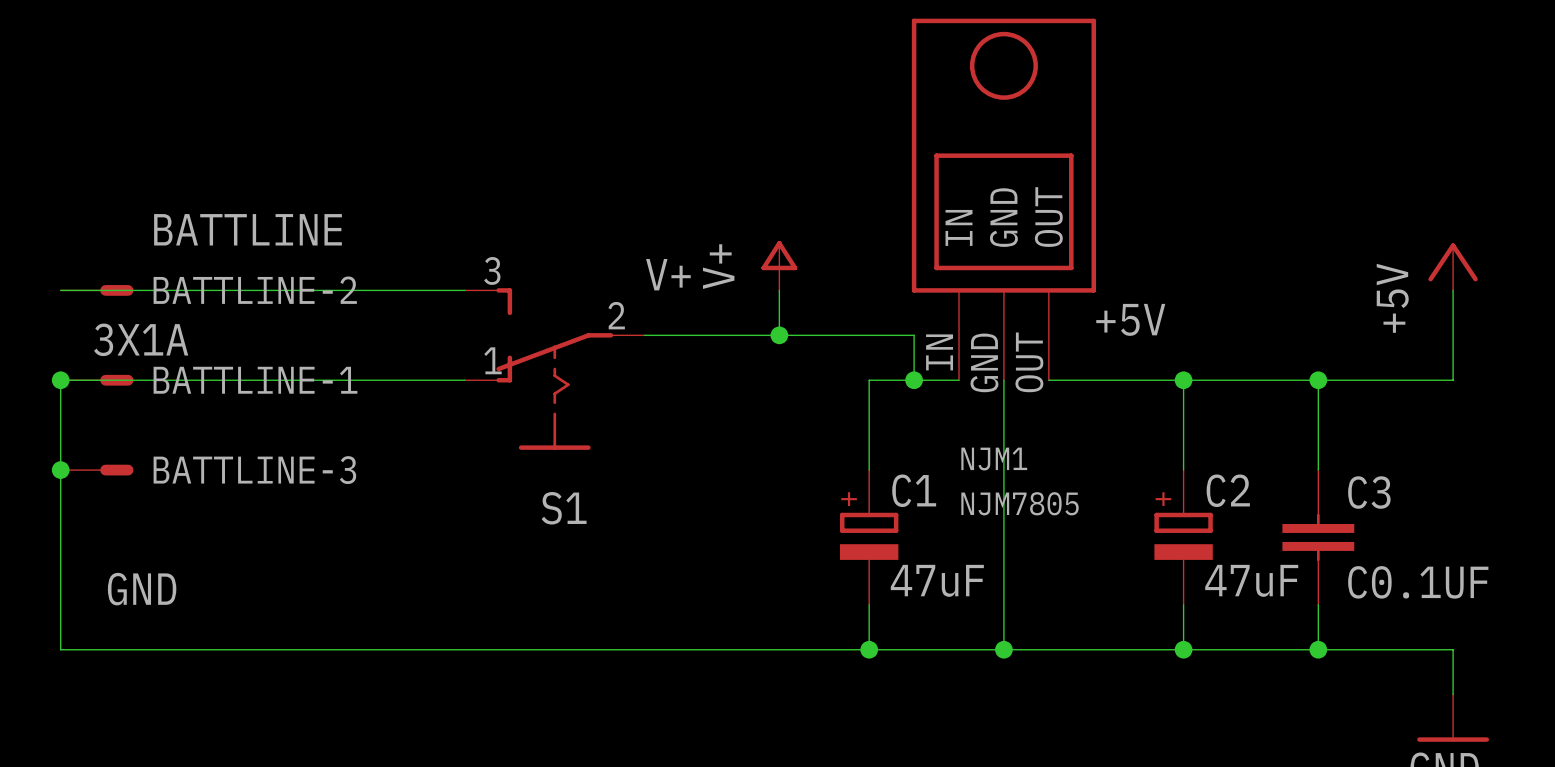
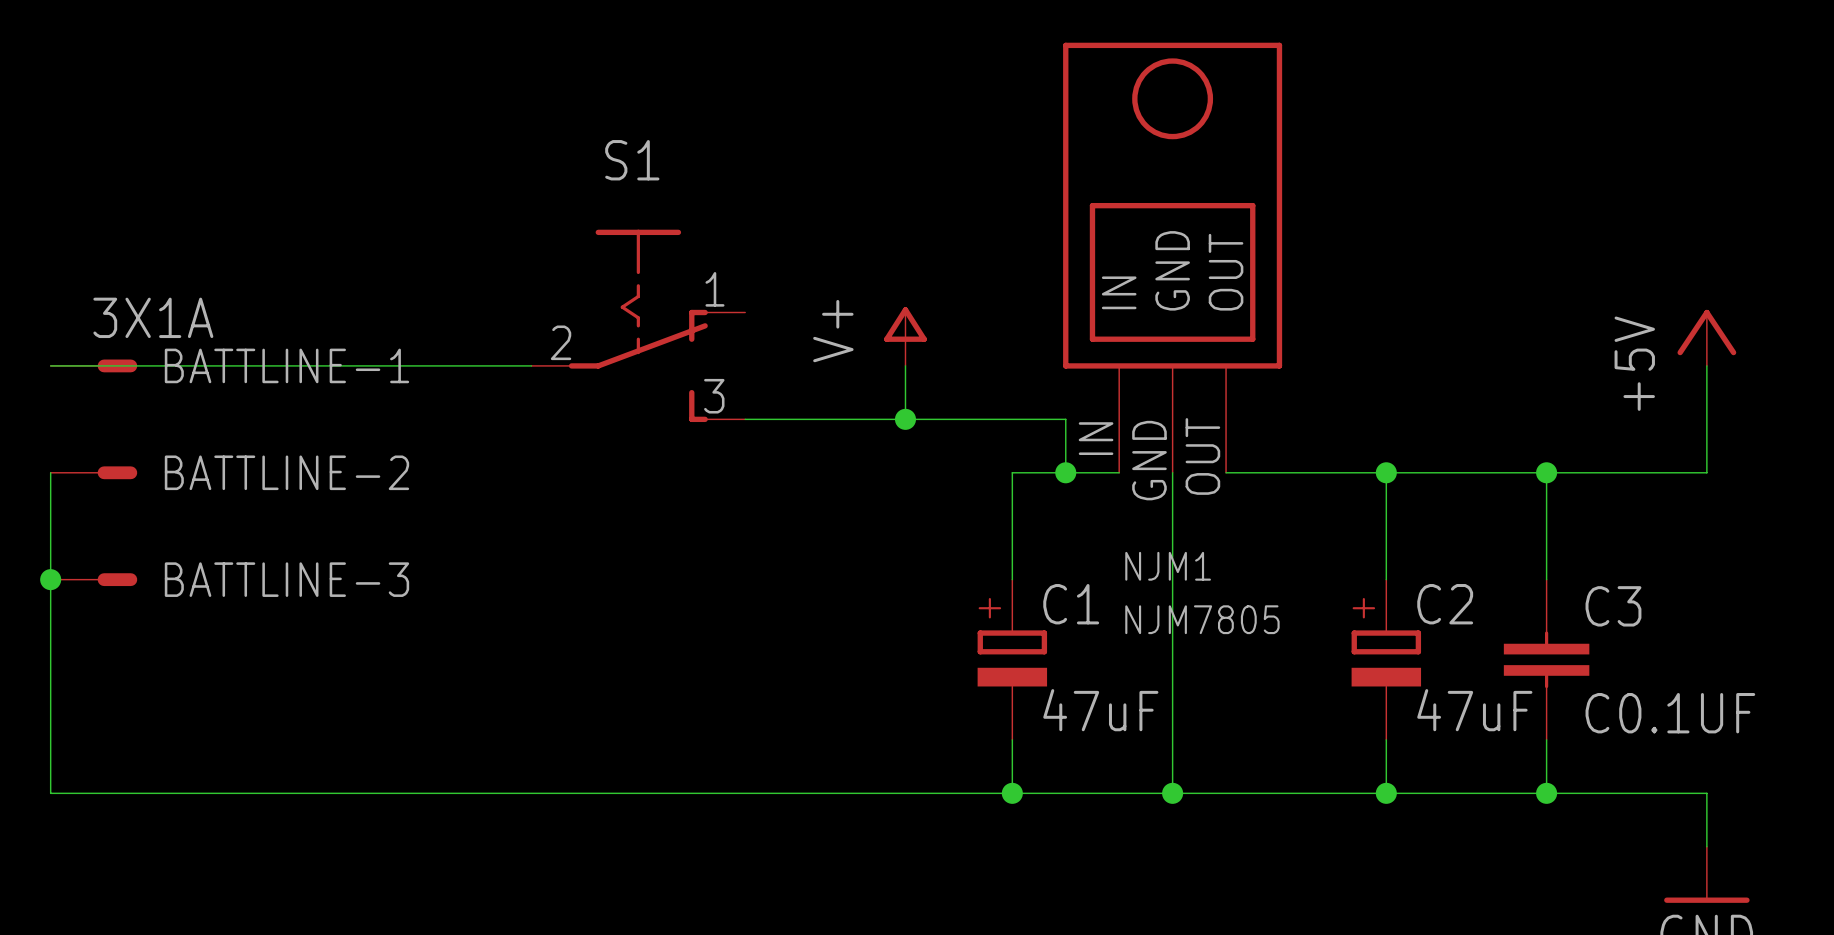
label: BATTLINE (248, 229) -> none
BATTLINE-2 value: none -> 3X1A (153, 317)
label: V+ (668, 274) -> none
BATTLINE-2 name: BATTLINE-2 (255, 290) -> BATTLINE-1 (286, 365)
label: +5V (1130, 319) -> none
BATTLINE-1 value: 3X1A (141, 339) -> none
S1 rotation: 0° (554, 369) -> 180° (638, 325)
S1 position: (554, 369) -> (638, 325)
wire: (60, 380) (464, 380) -> none
junction: (60, 380) -> none
BATTLINE-1 name: BATTLINE-1 (255, 380) -> BATTLINE-2 (286, 472)
label: GND (142, 589) -> none

